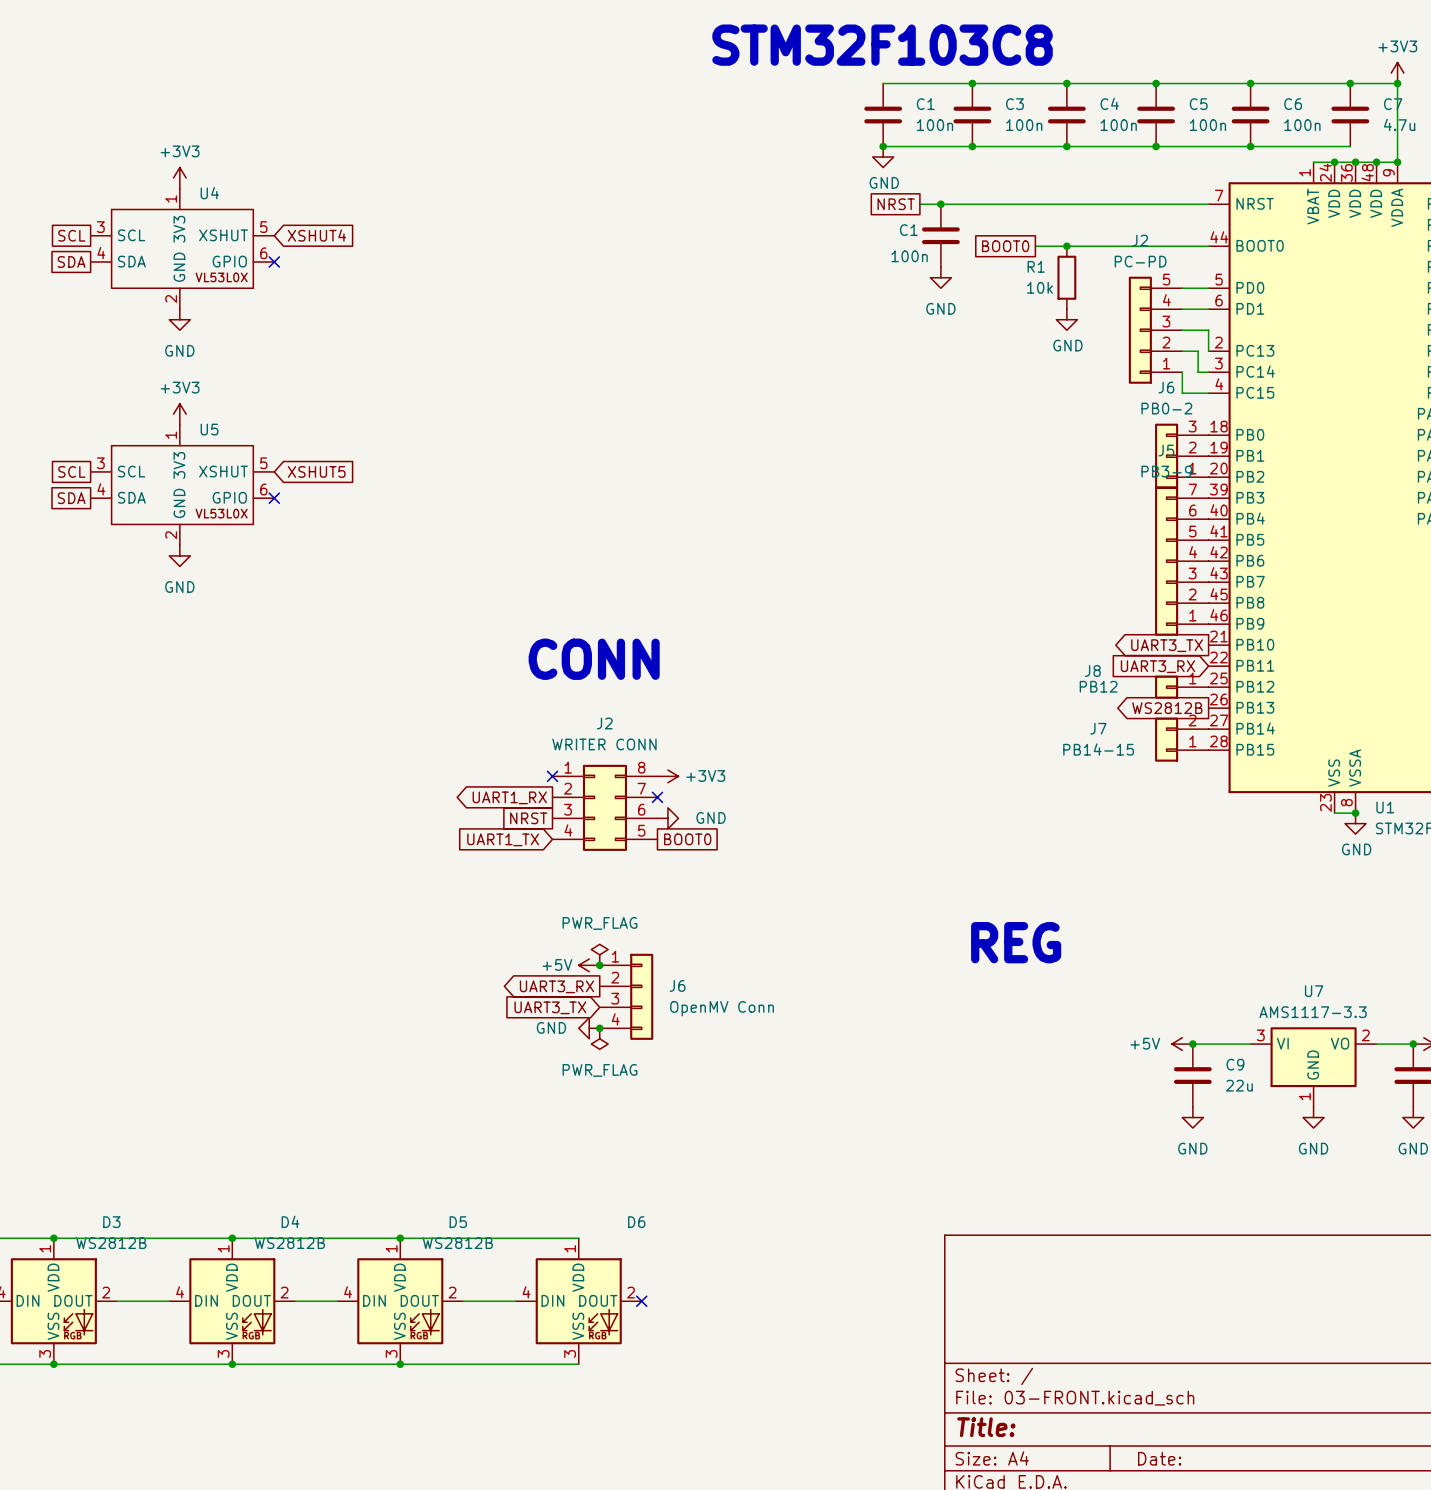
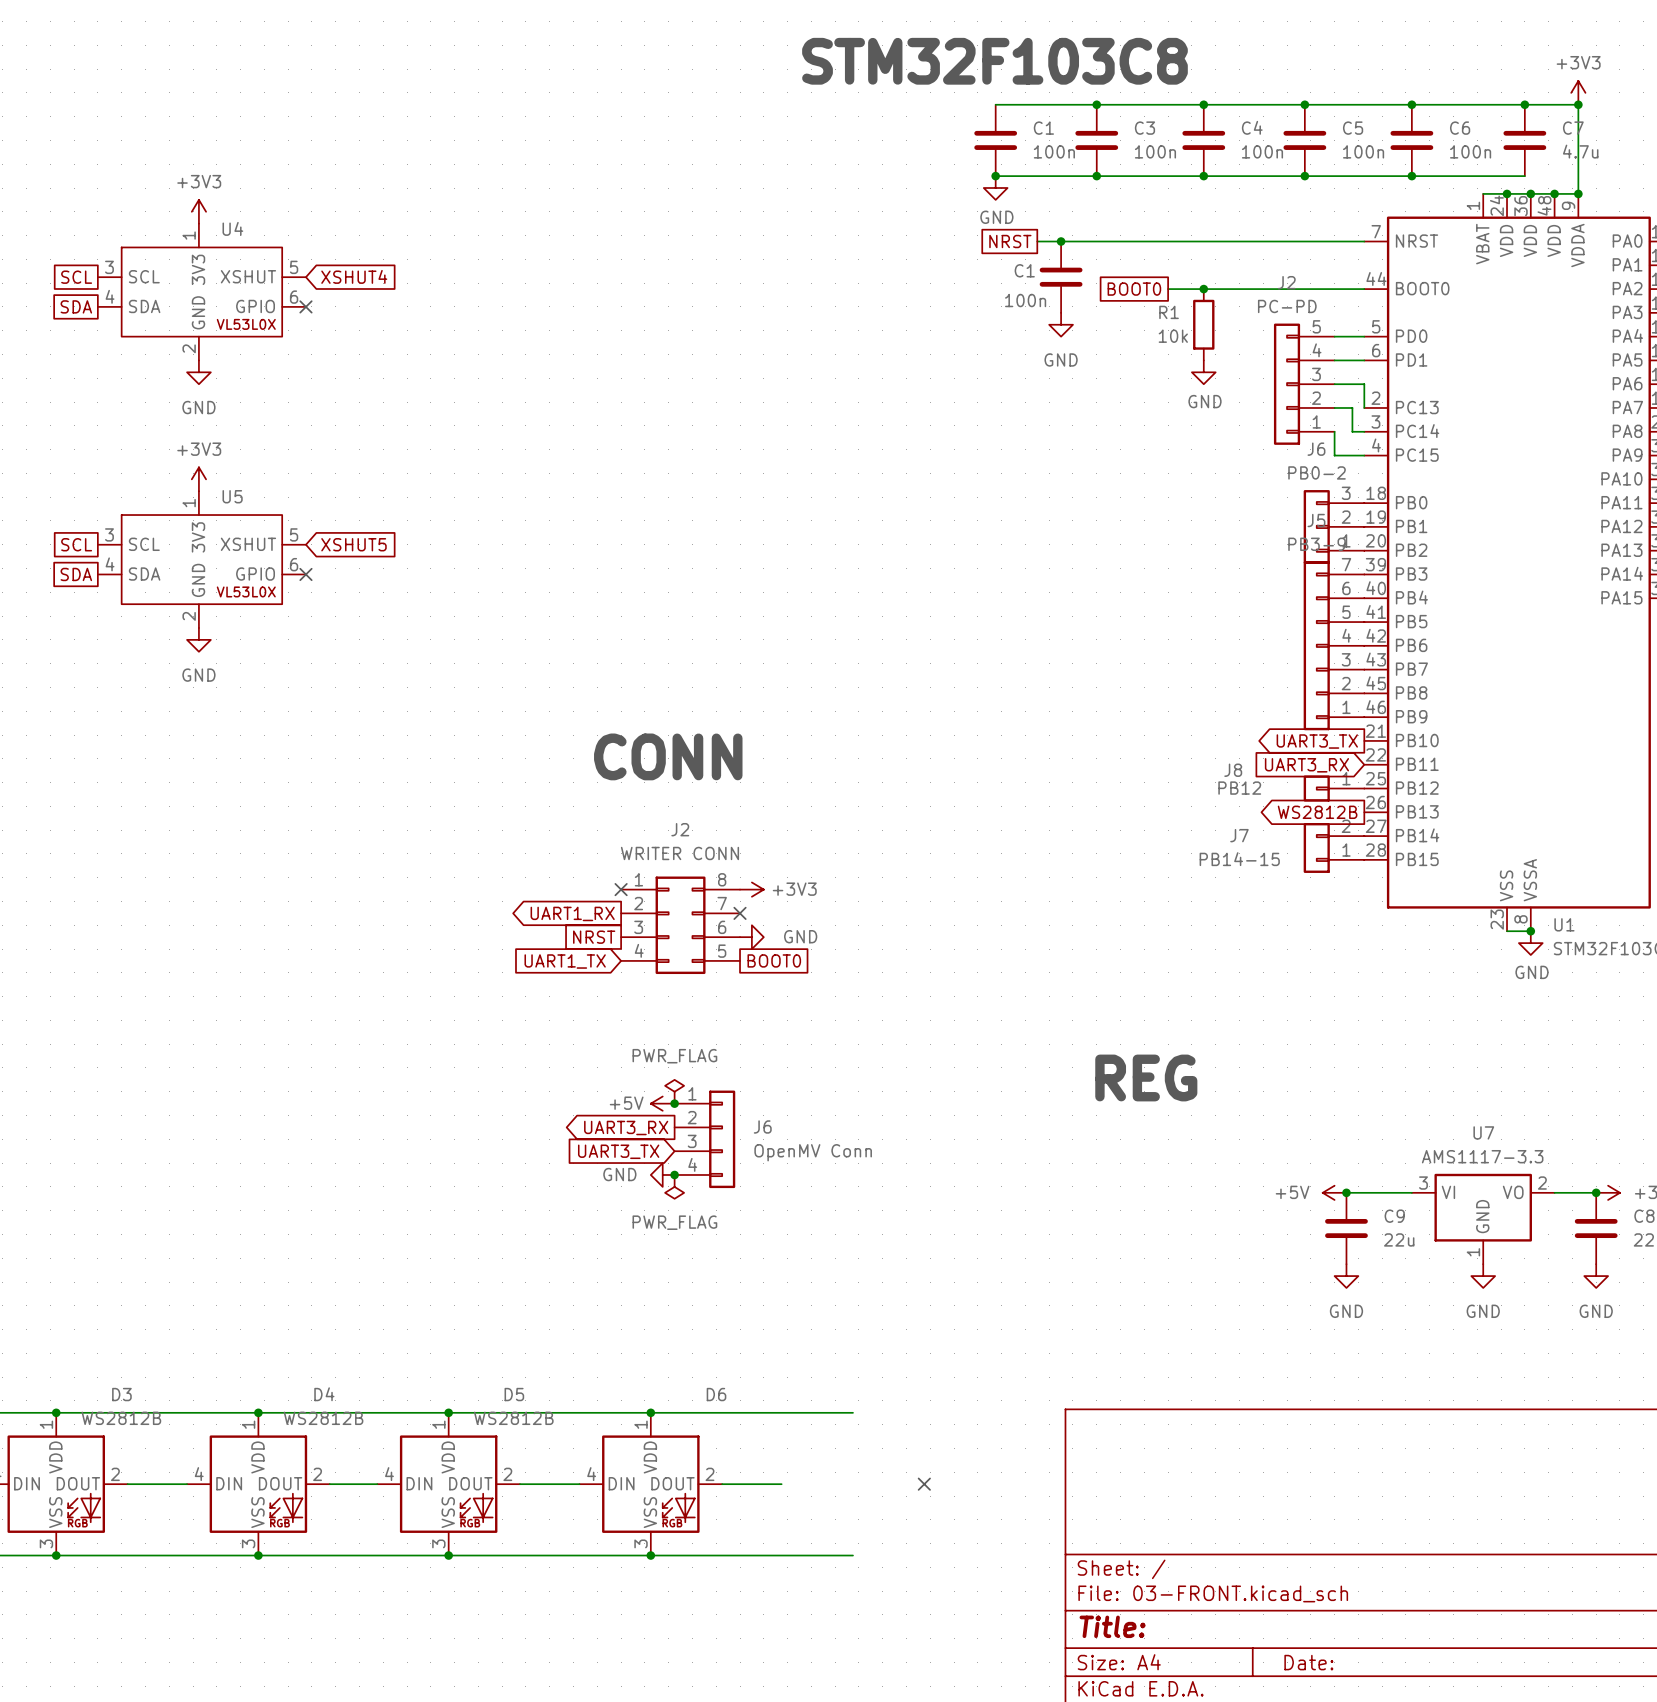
wire: none -> (650, 1412) (852, 1412)
junction: none -> (650, 1412)
wire: none -> (722, 1484) (781, 1484)
no-connect mark: (641, 1301) -> none
no-connect mark: none -> (924, 1484)
wire: none -> (650, 1555) (852, 1555)
junction: none -> (650, 1555)

